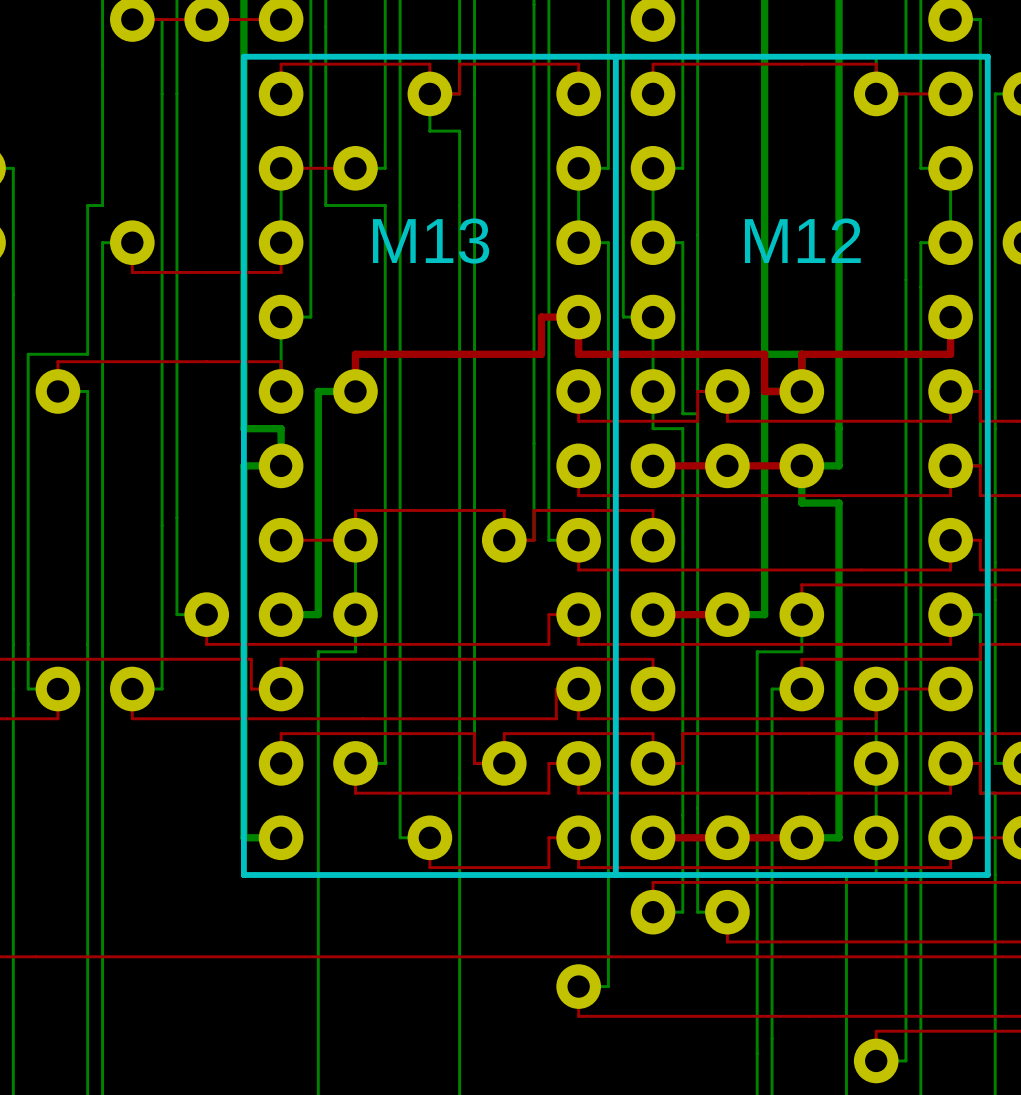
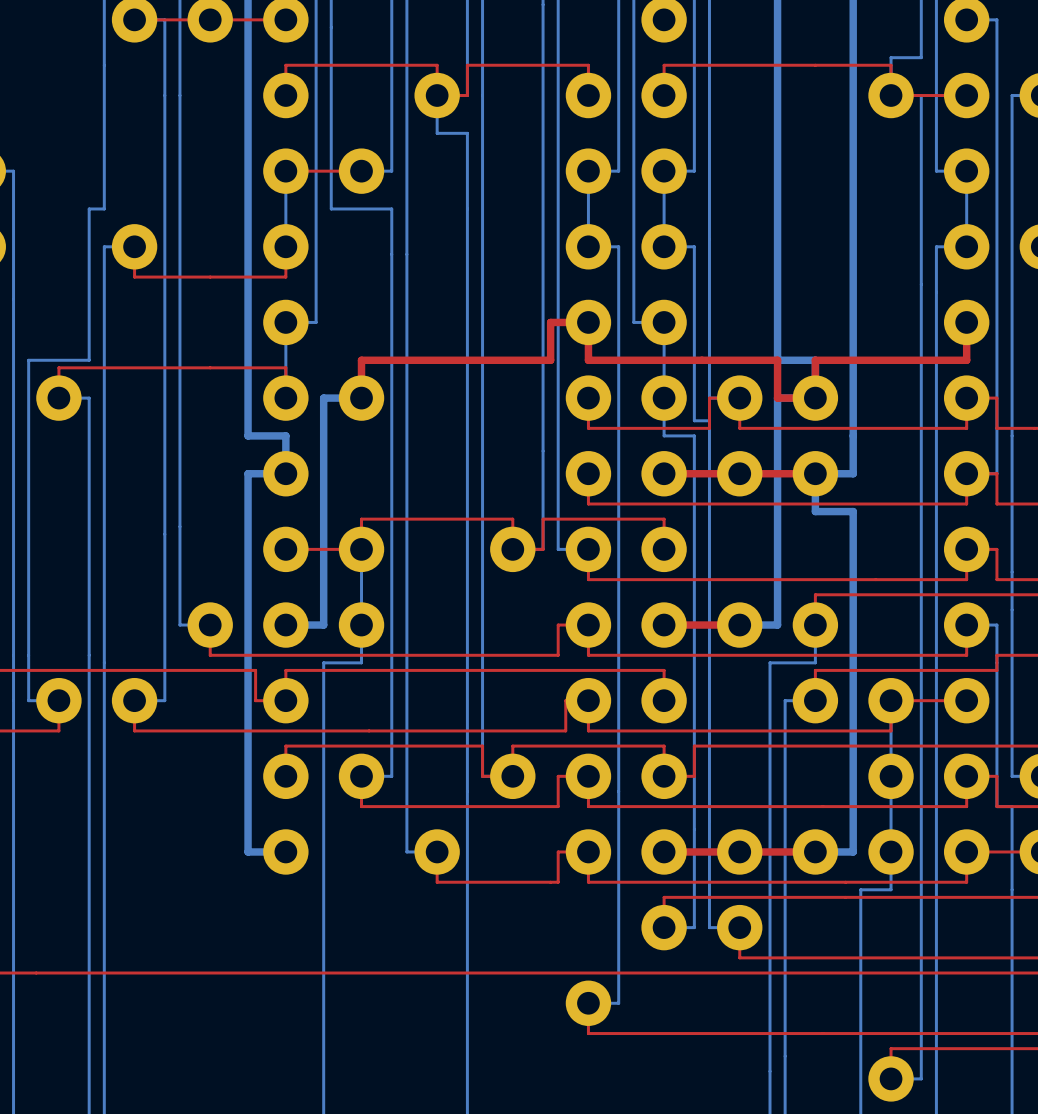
line: (243, 56) (243, 874) (987, 874) (987, 56) (243, 56) -> none
line: (615, 56) (615, 874) -> none
text: M12 (802, 240) -> none
text: M13 (431, 241) -> none

